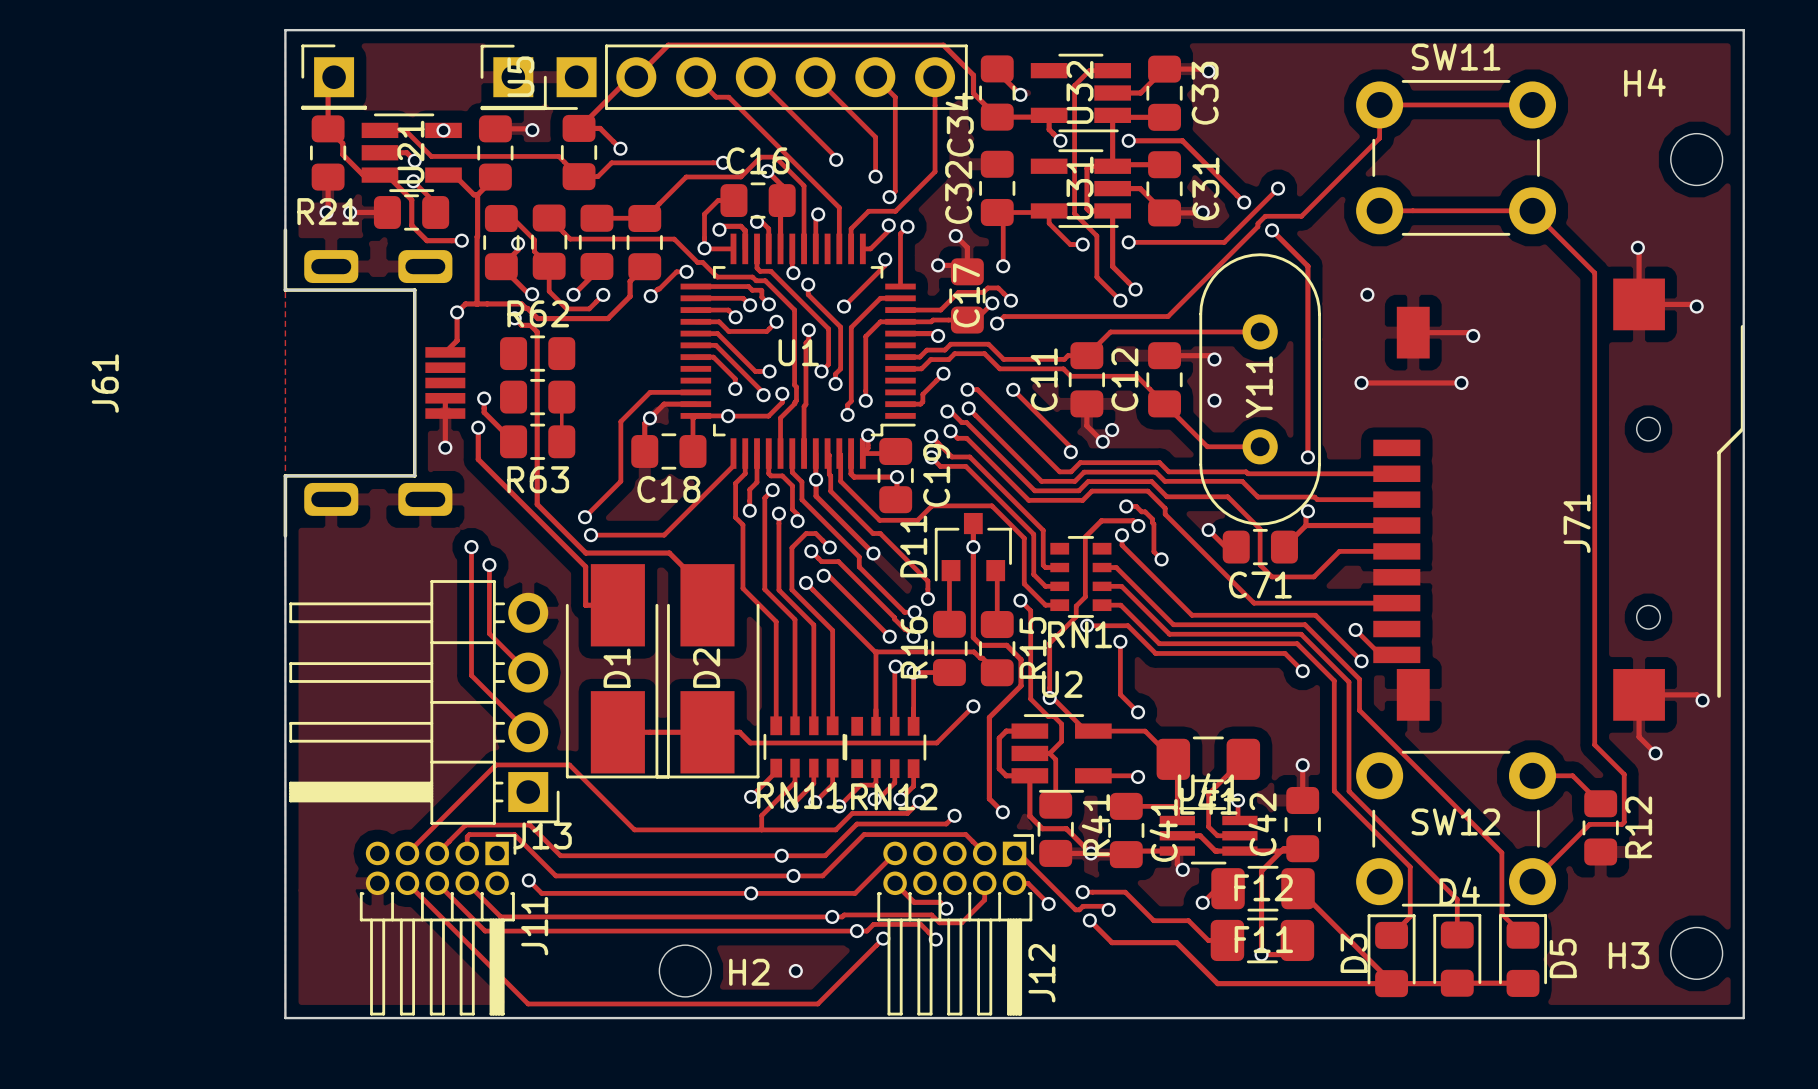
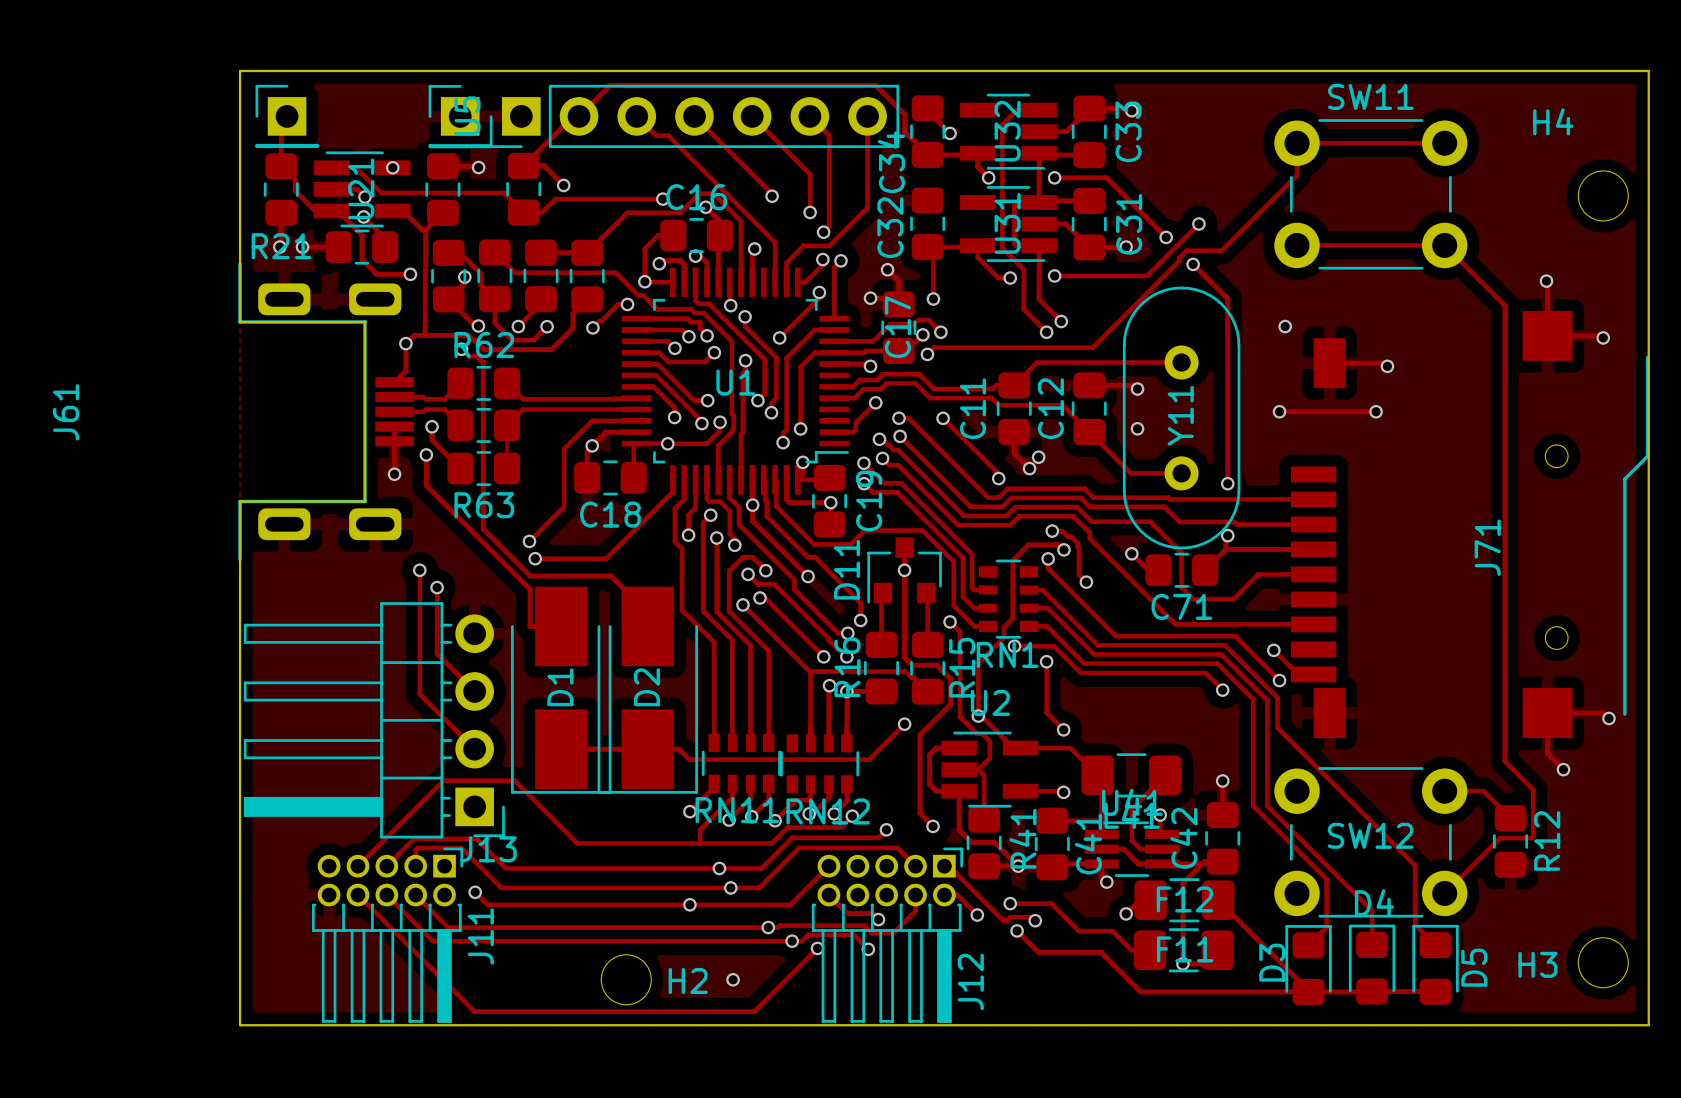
track: none -> (460, 383) (444, 399) (394, 397)
track: none -> (507, 383) (522, 399) (636, 398)
track: none -> (636, 409) (522, 409) (507, 425)
track: none -> (394, 411) (444, 409) (460, 425)

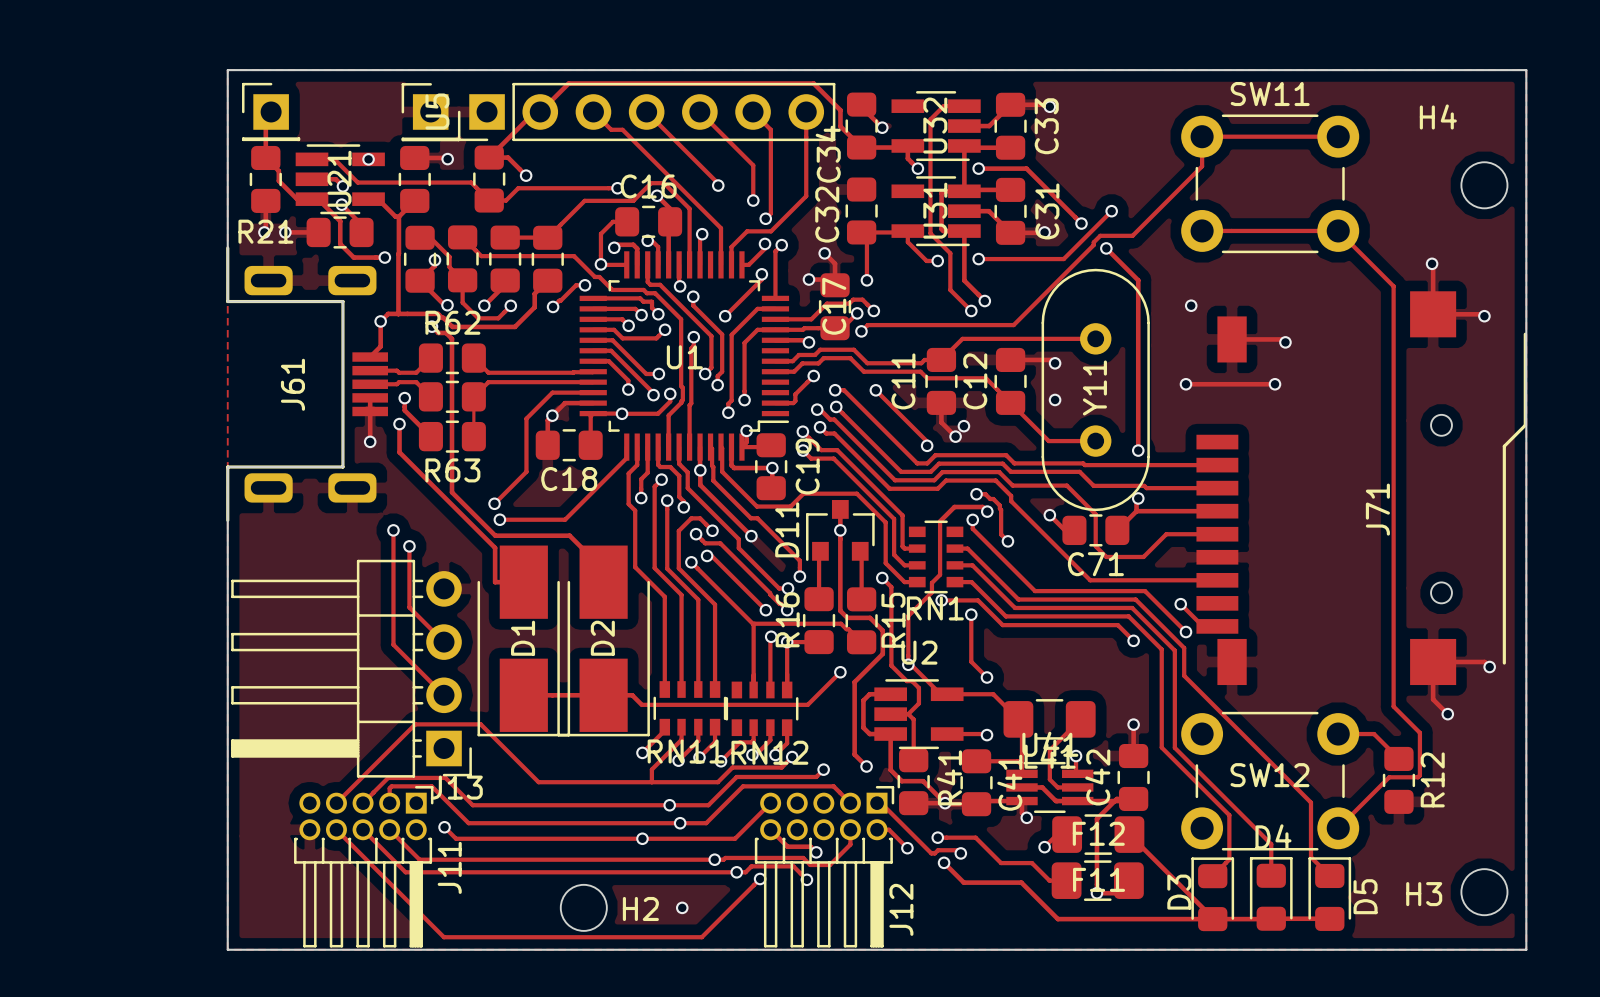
J61 name position: J61 (66, 412) -> J61 (292, 384)

